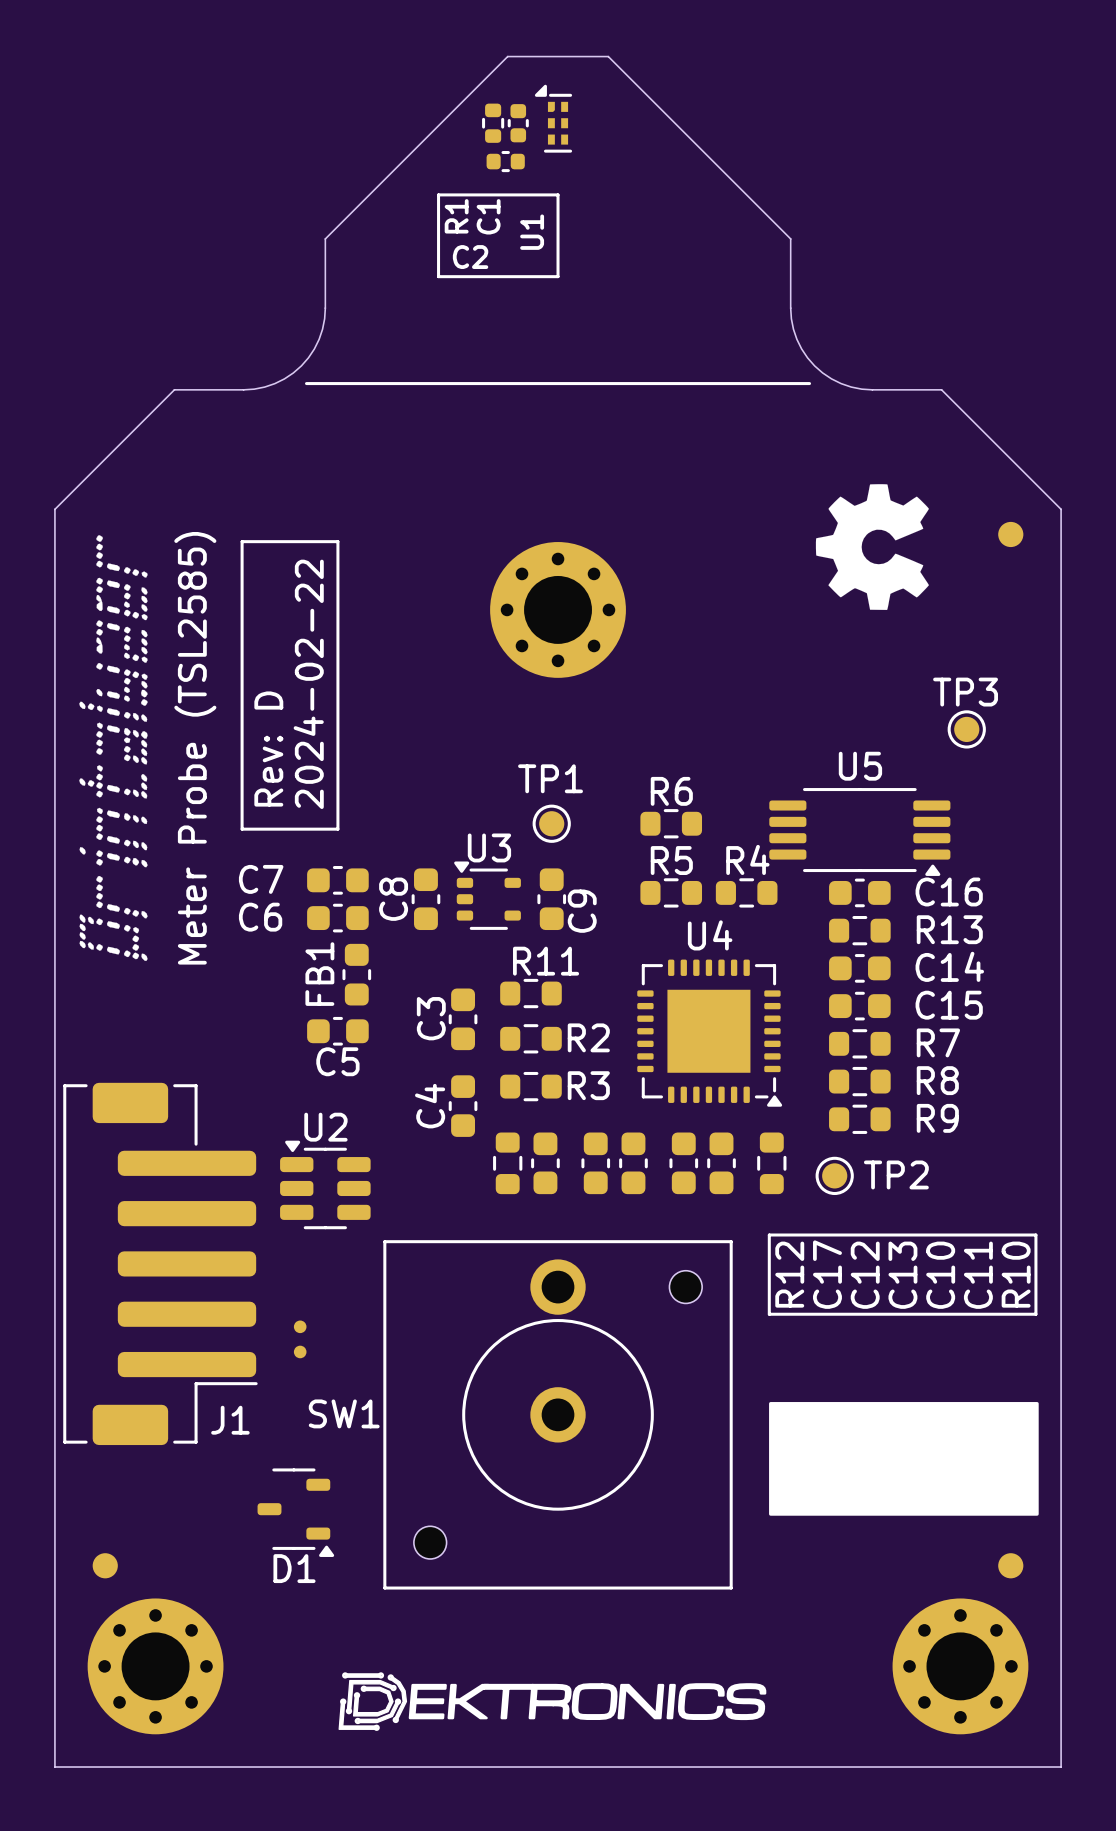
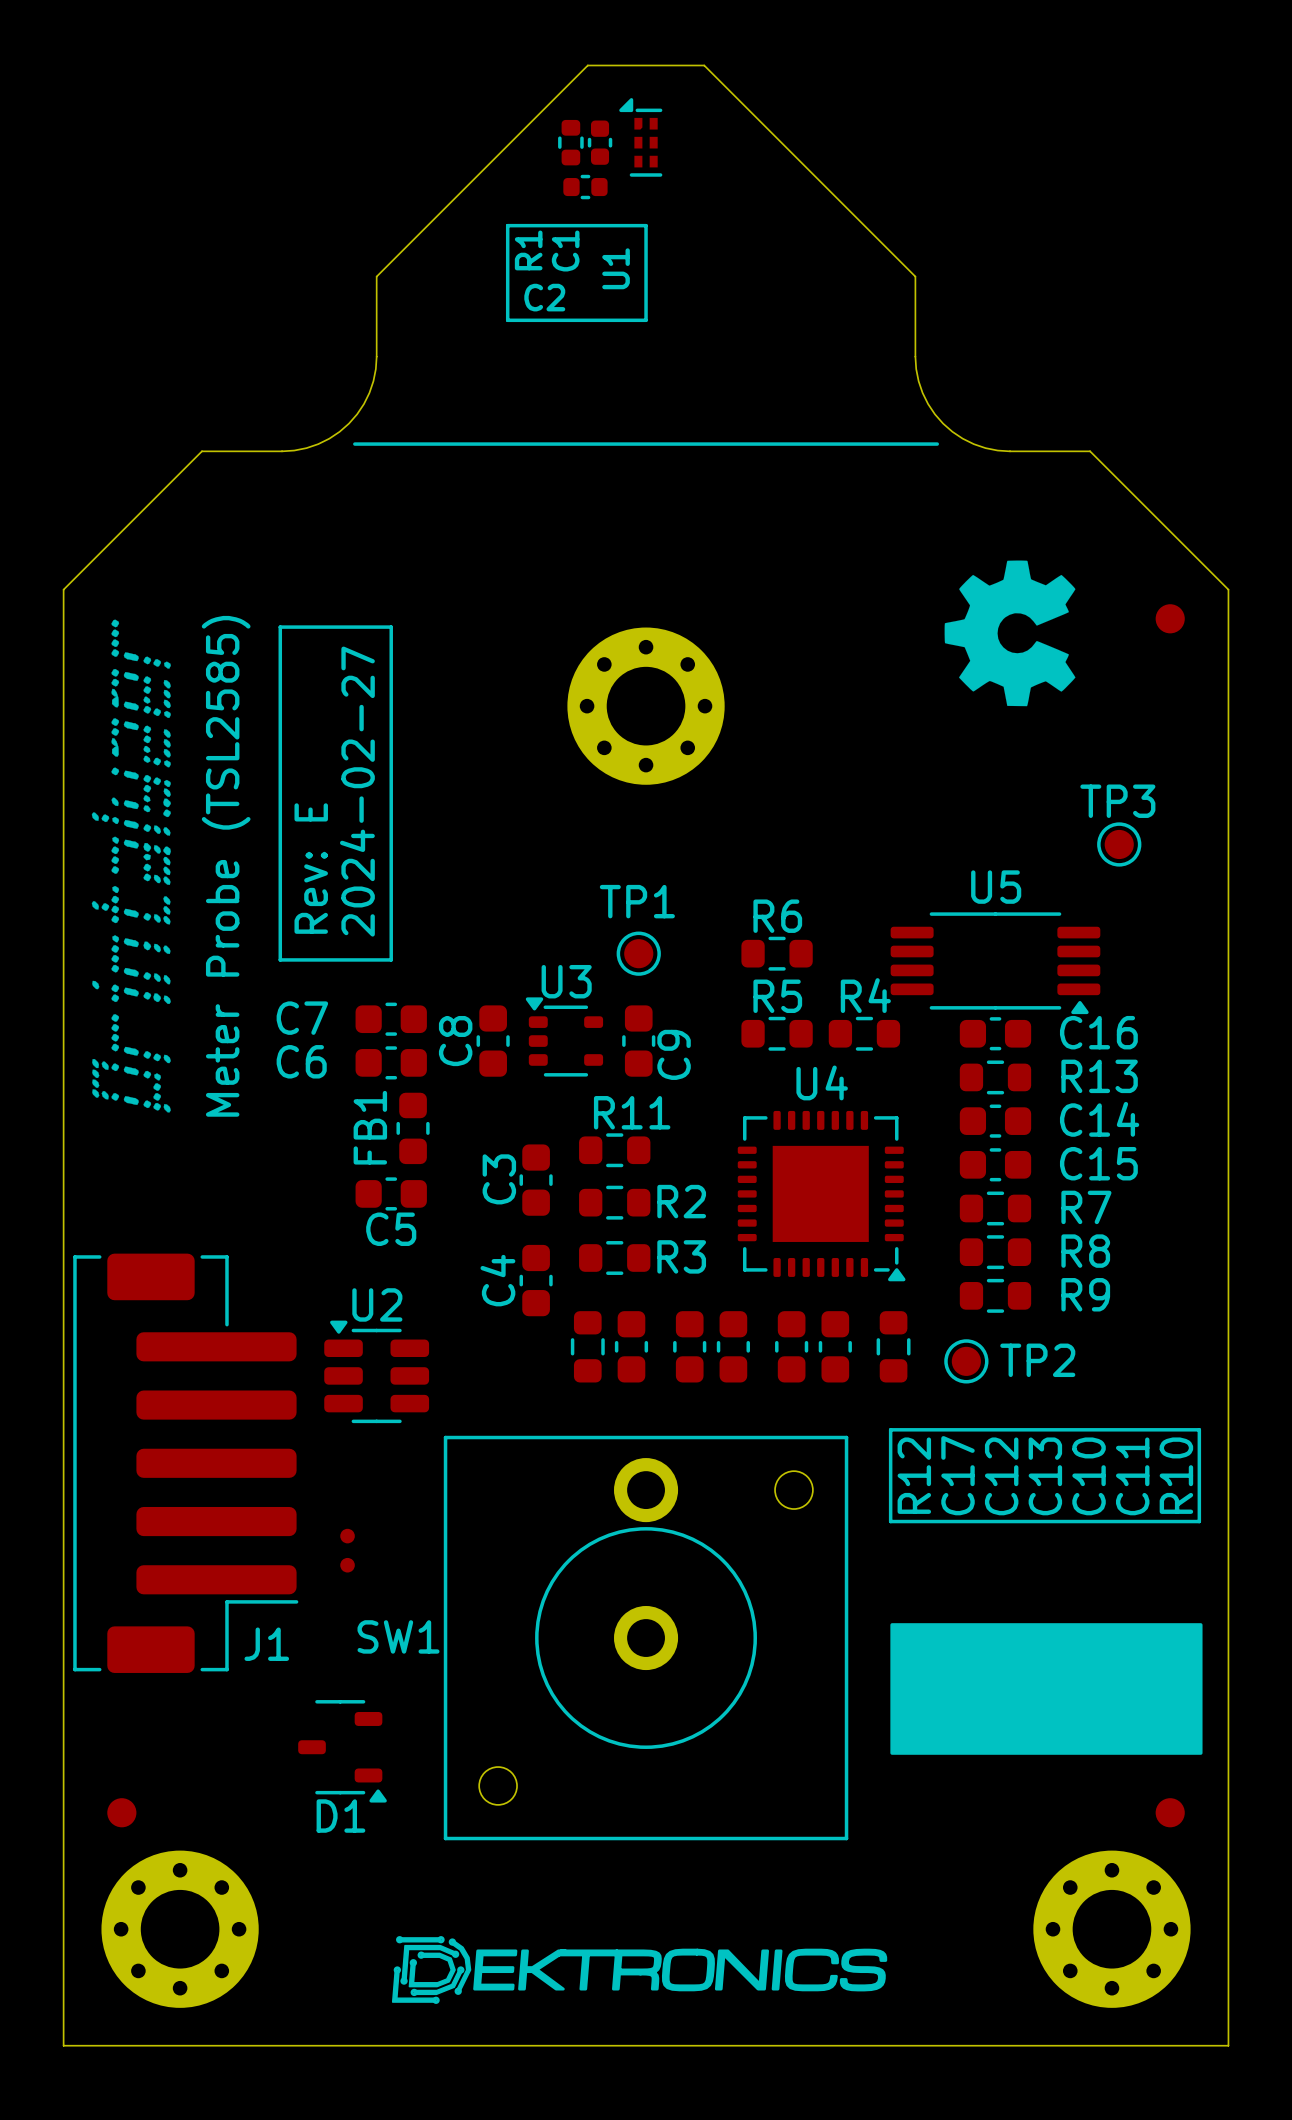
text: 2024-02-22 (308, 684) -> 2024-02-27 (357, 791)
text: Rev: D (268, 749) -> Rev: E (311, 868)

